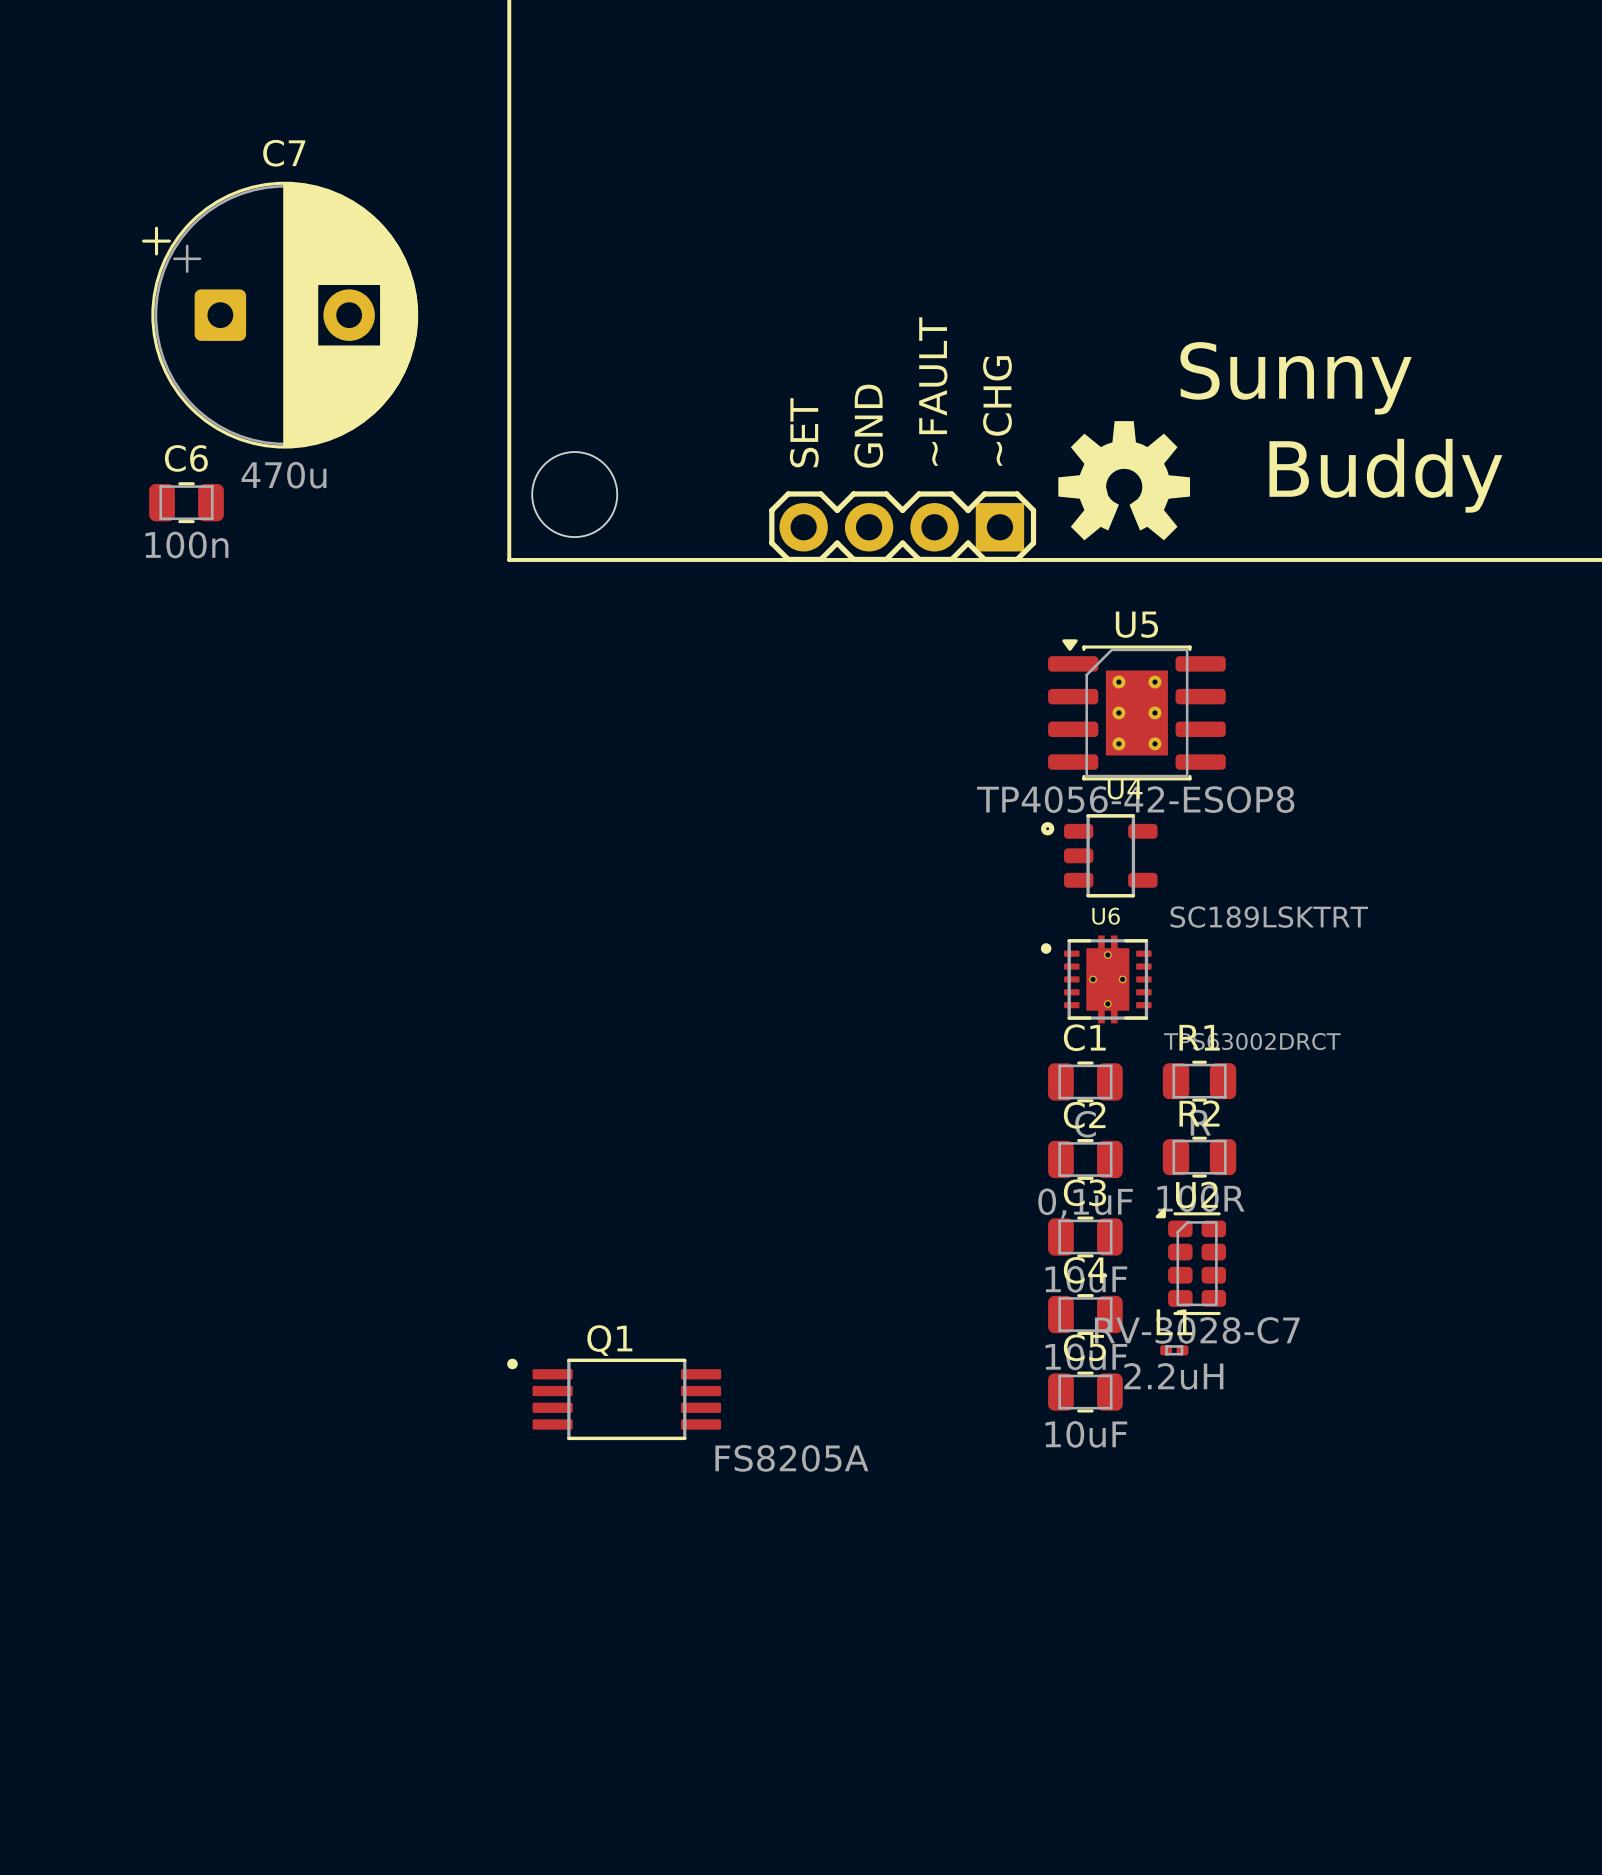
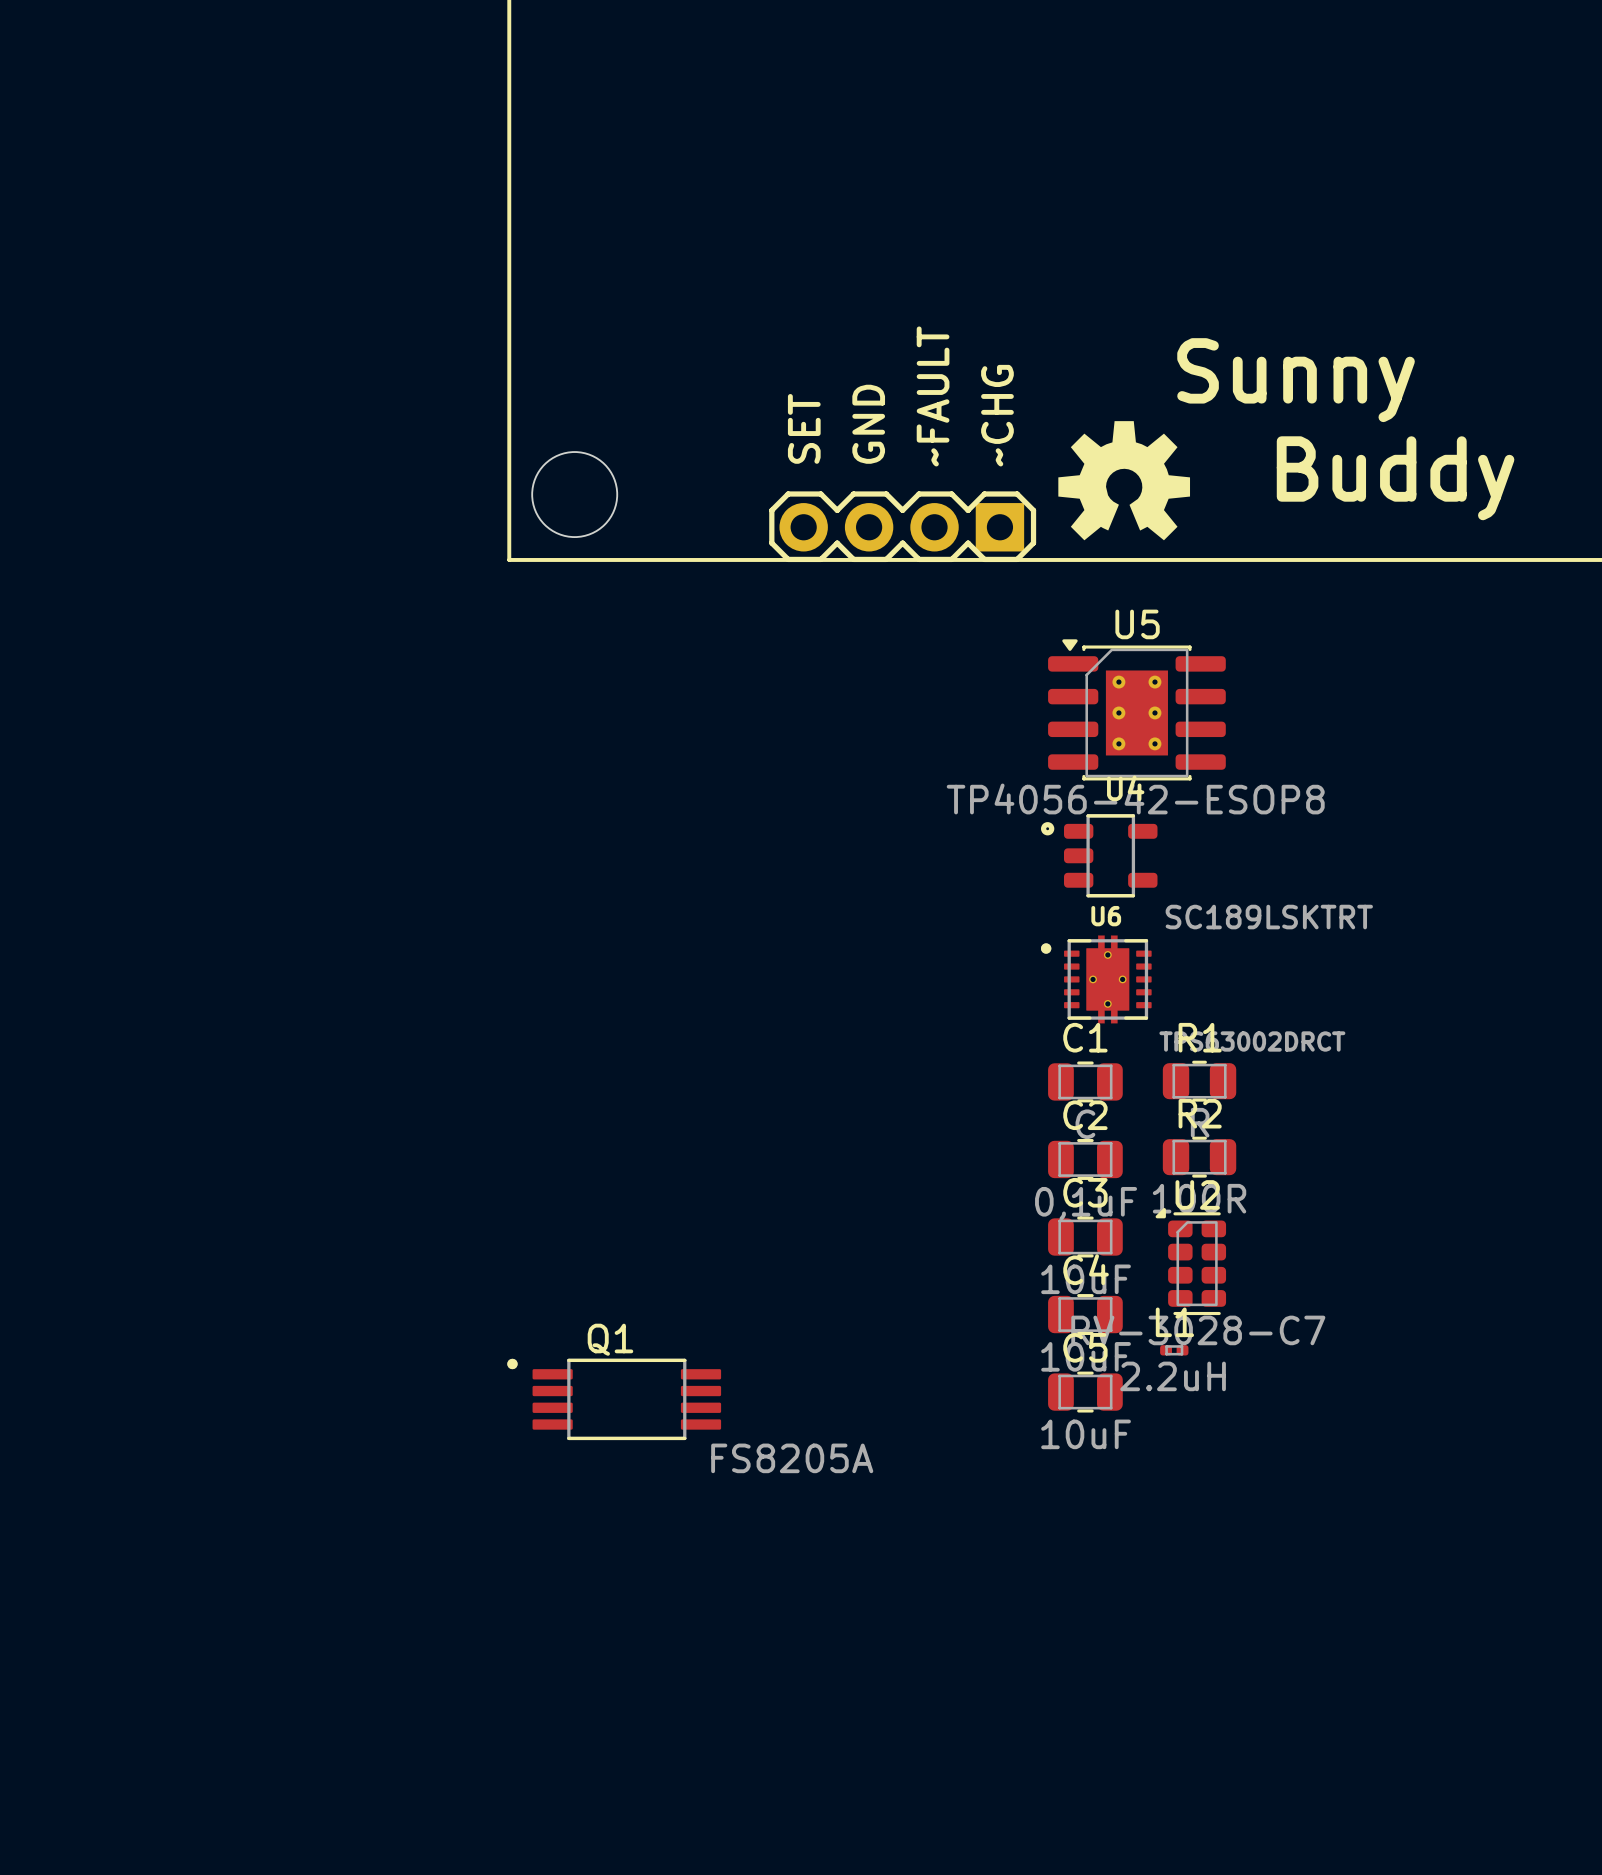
C7: 470u (280, 315) -> none
C6: 100n (186, 502) -> none

